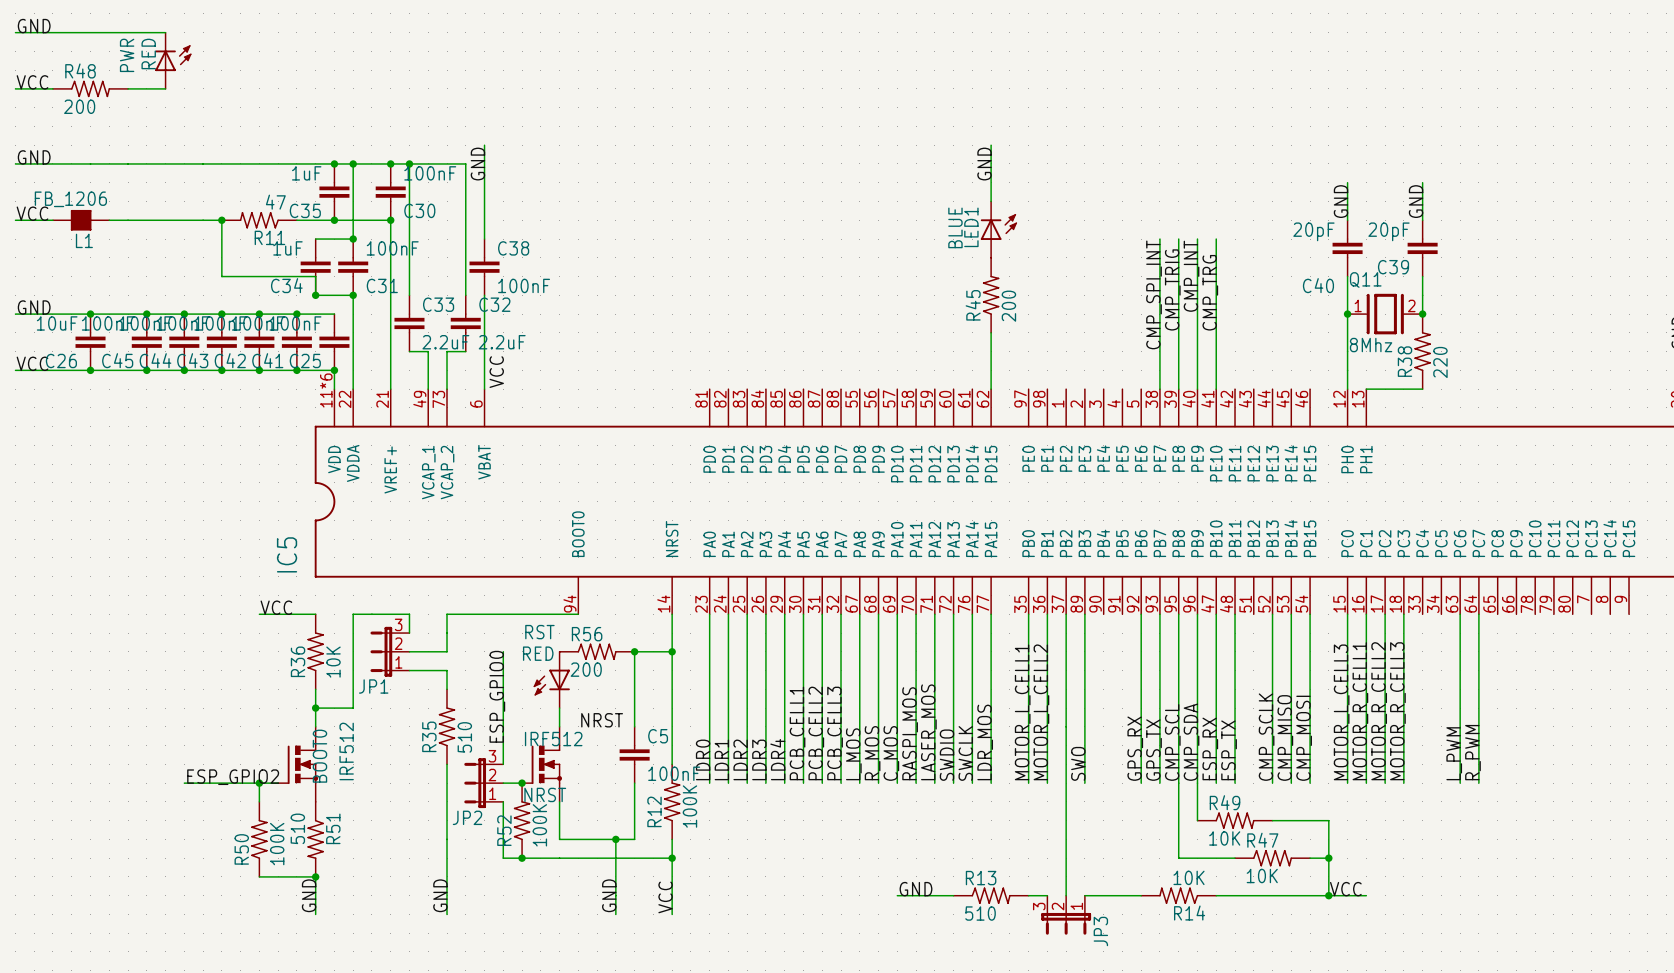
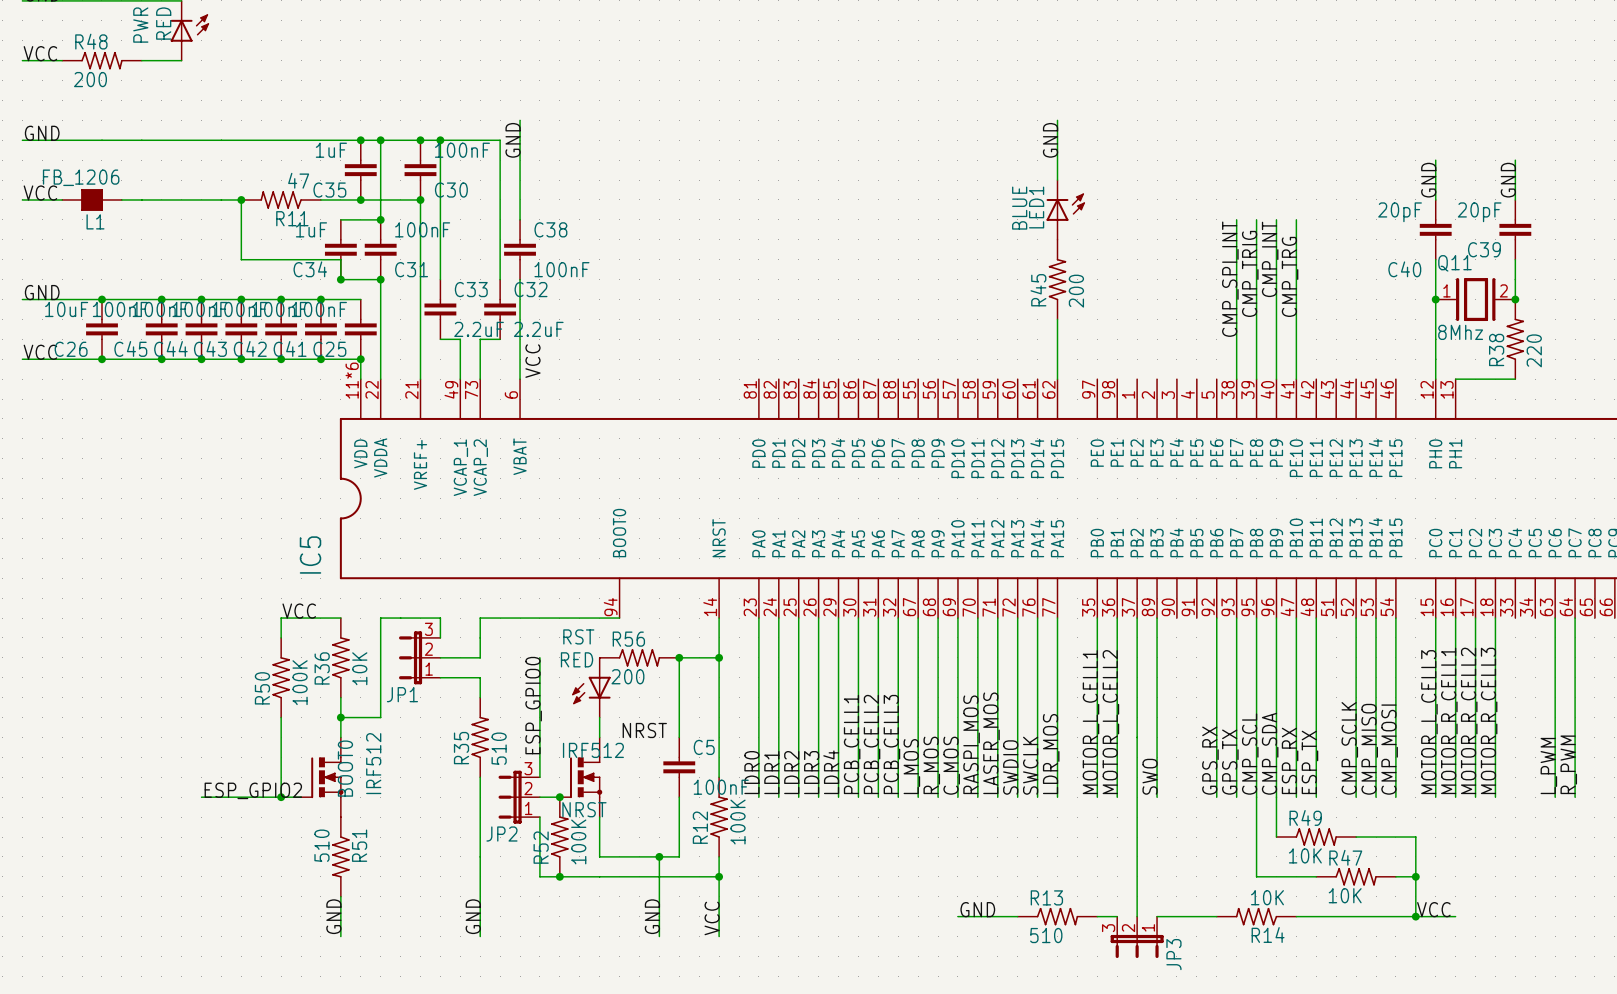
wire: none -> (281, 618) (281, 637)
wire: (259, 783) (259, 801) -> (281, 797) (281, 717)
R50 position: (259, 839) -> (281, 677)
wire: (259, 876) (315, 876) -> none
junction: (315, 876) -> none

